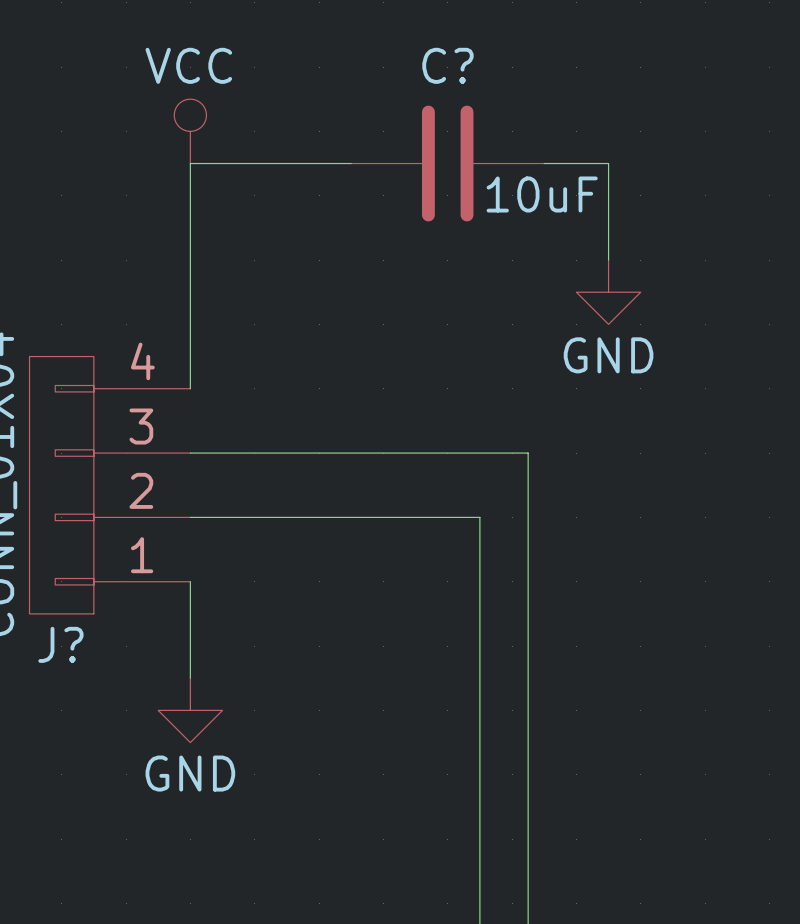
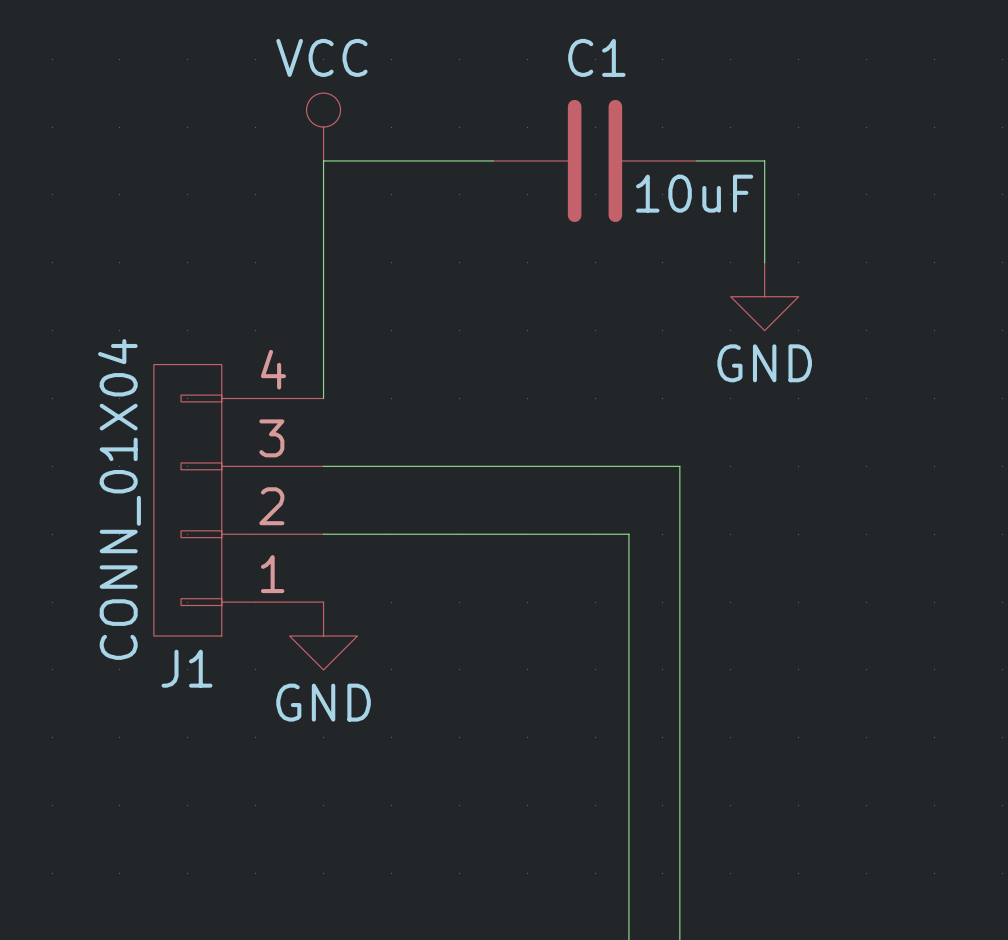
C? name: C? (447, 65) -> C1 (596, 57)
wire: (190, 581) (190, 678) -> none
J? name: J? (60, 644) -> J1 (187, 668)
power symbol position: GND (190, 710) -> GND (323, 636)

